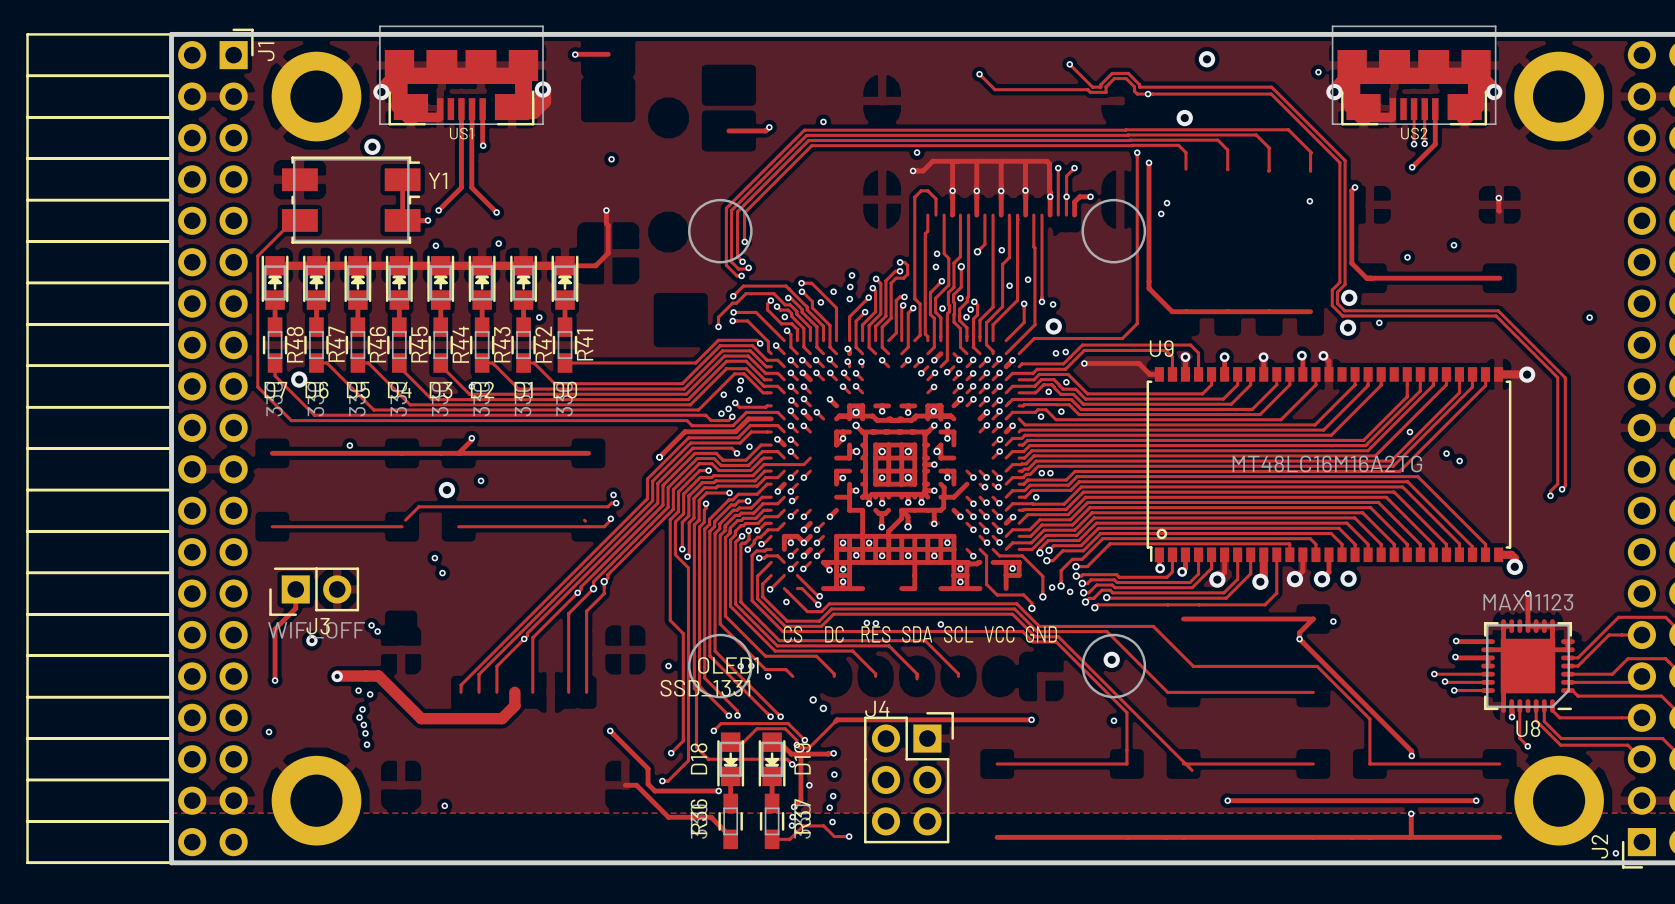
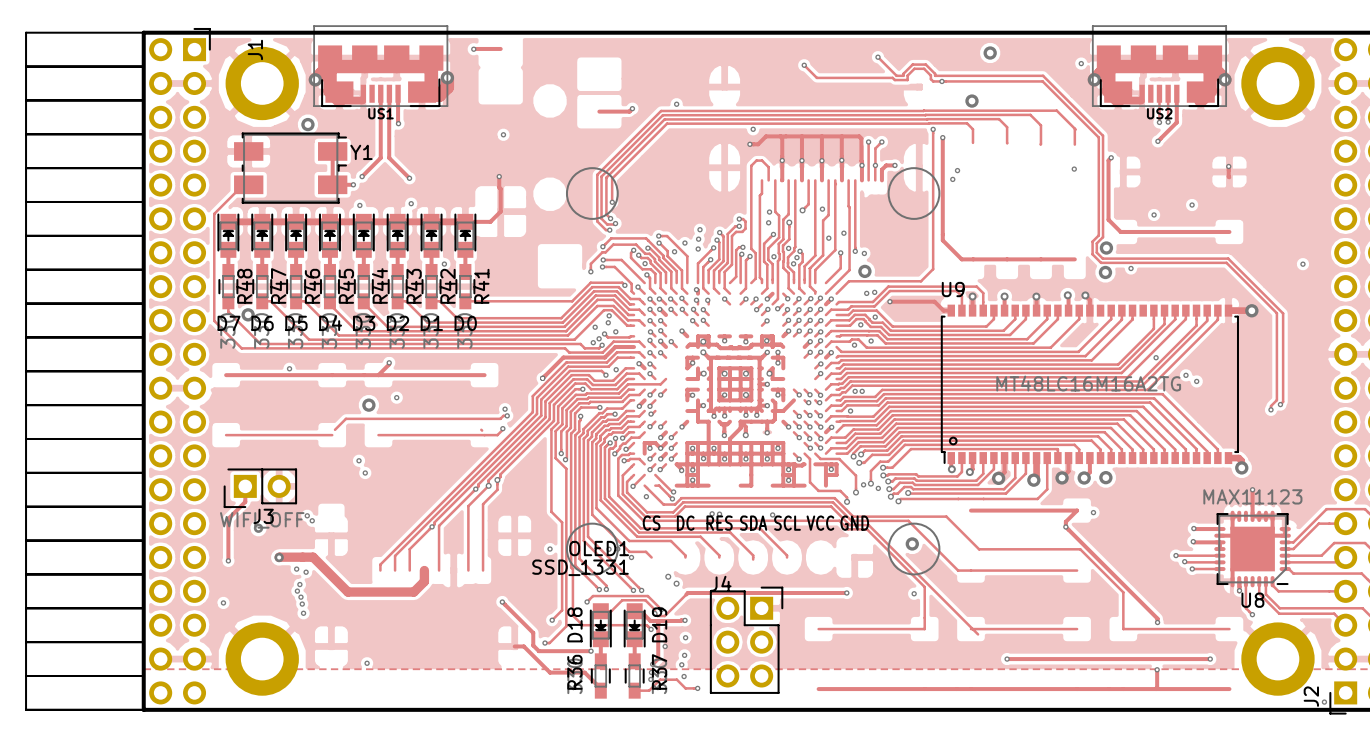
J1 name position: J1 (266, 51) -> J1 (255, 49)

